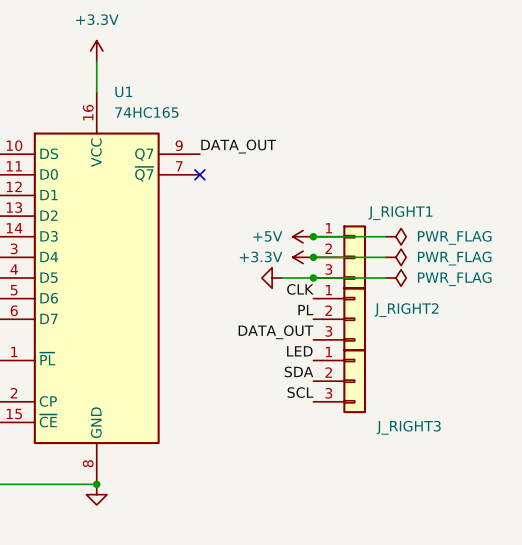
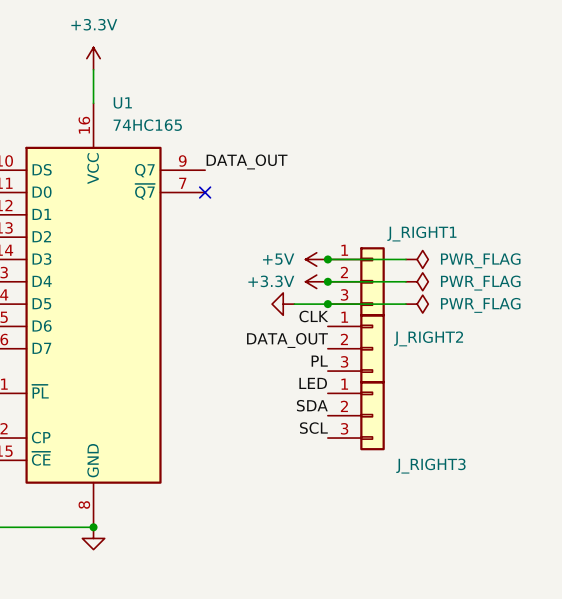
label: PL (305, 310) -> DATA_OUT (287, 340)
label: DATA_OUT (276, 332) -> PL (319, 361)

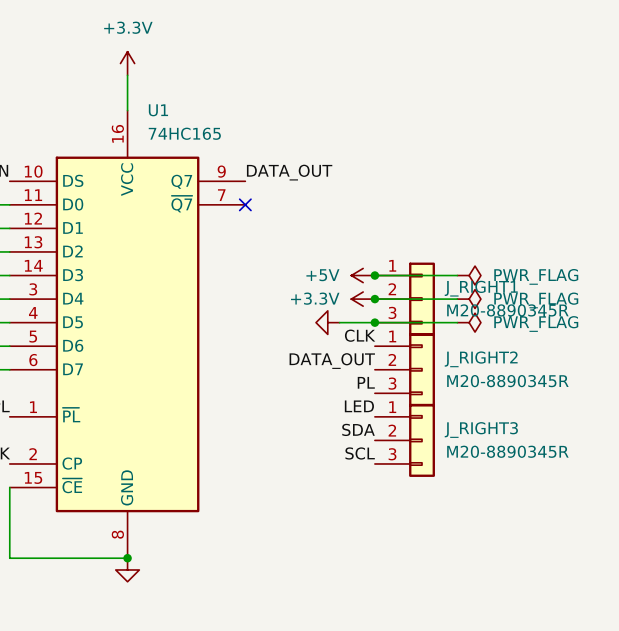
J_RIGHT1 name position: J_RIGHT1 (421, 233) -> J_RIGHT1 (481, 288)
J_RIGHT1 value: none -> M20-8890345R (507, 310)
J_RIGHT2 value: none -> M20-8890345R (507, 381)
J_RIGHT3 value: none -> M20-8890345R (507, 451)
J_RIGHT3 name position: J_RIGHT3 (430, 466) -> J_RIGHT3 (481, 430)

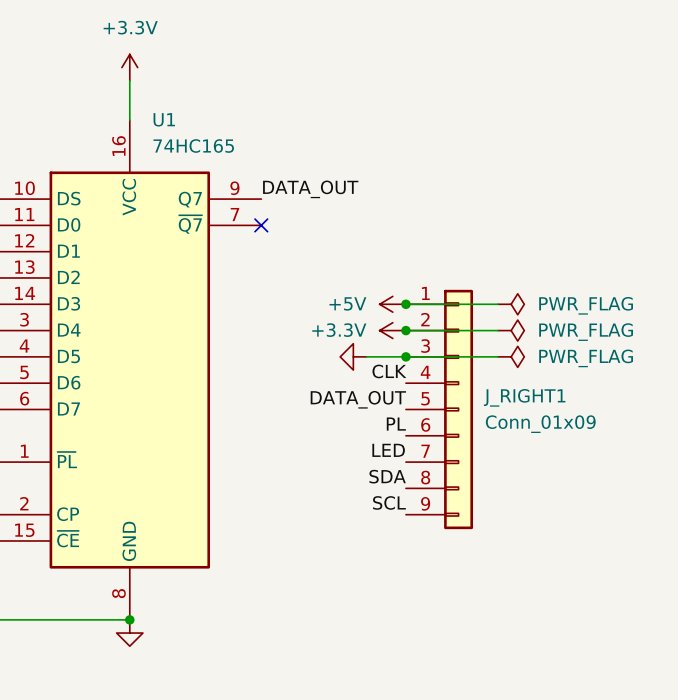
J_RIGHT1 symbol: [374, 262, 435, 336] -> [405, 289, 474, 530]
J_RIGHT1 value: M20-8890345R (507, 310) -> Conn_01x09 (540, 424)
J_RIGHT2: M20-8890345R (404, 369) -> none
J_RIGHT3: M20-8890345R (404, 440) -> none

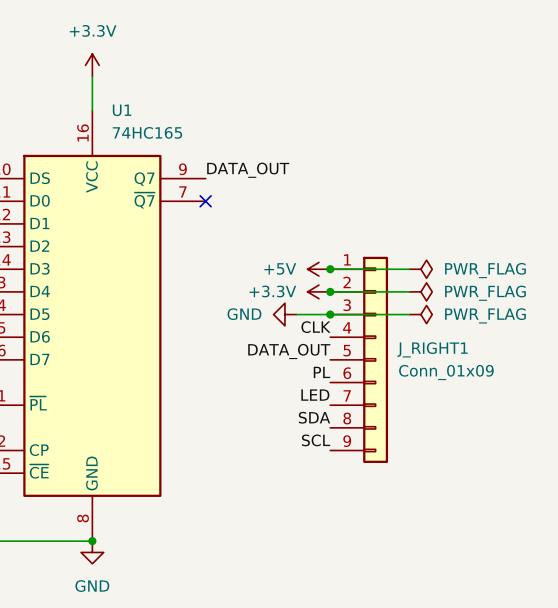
power symbol text: none -> GND (244, 314)
power symbol text: none -> GND (92, 586)

